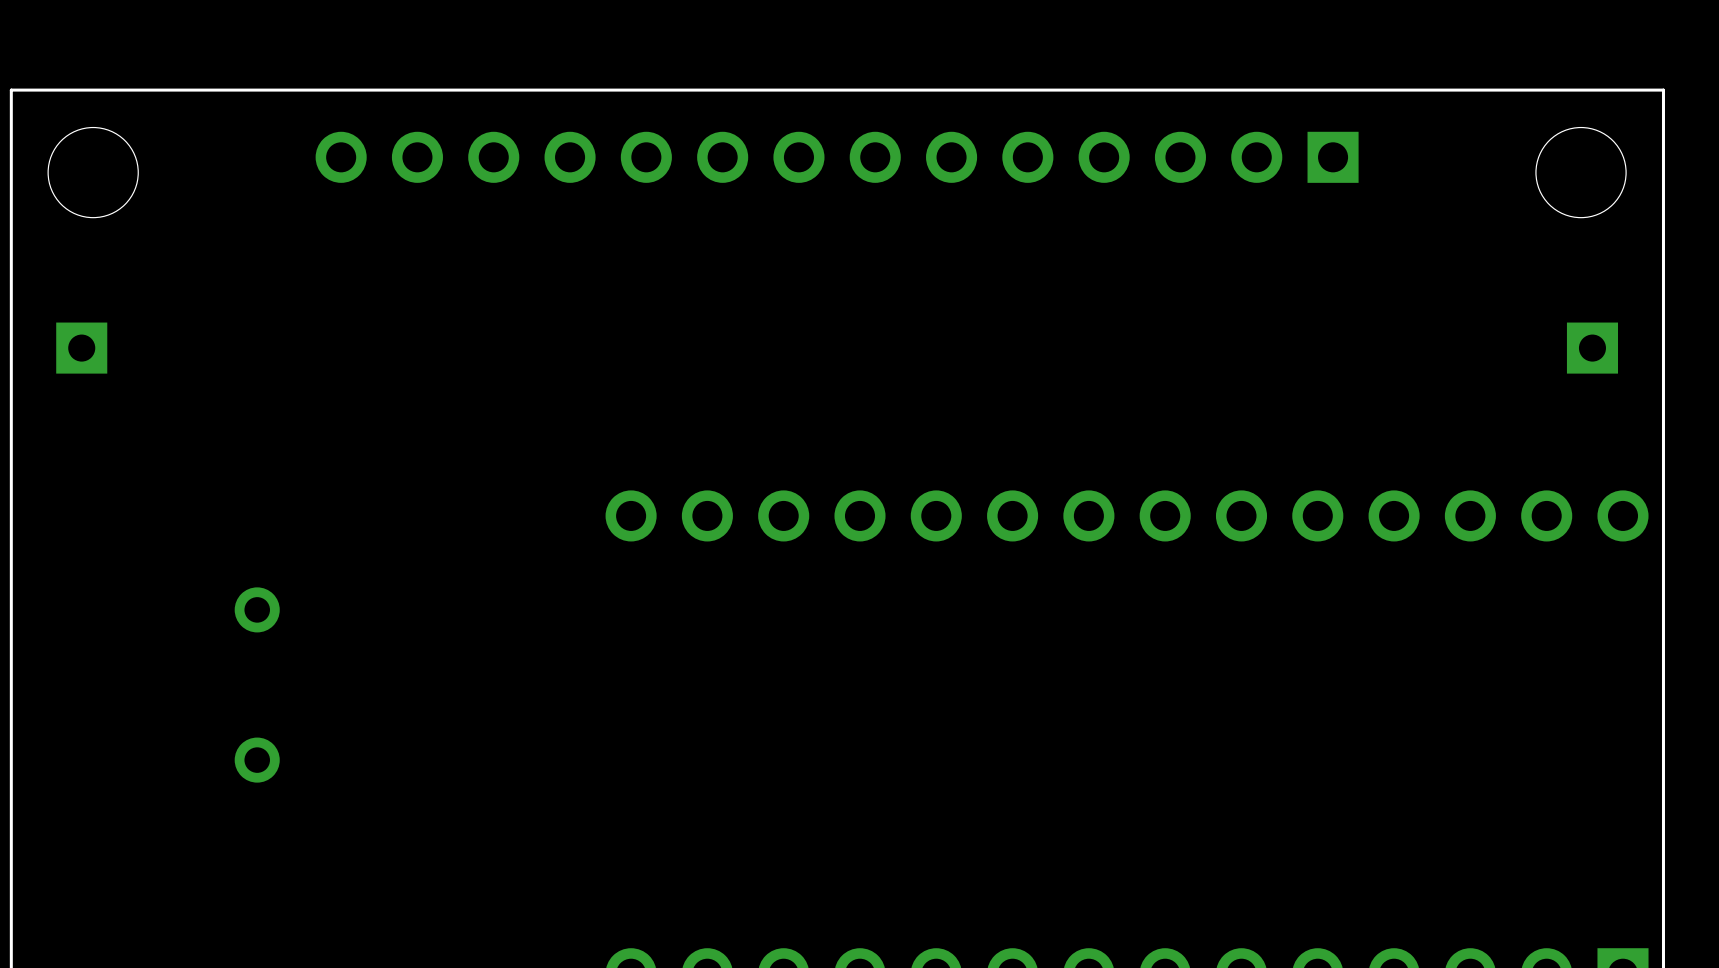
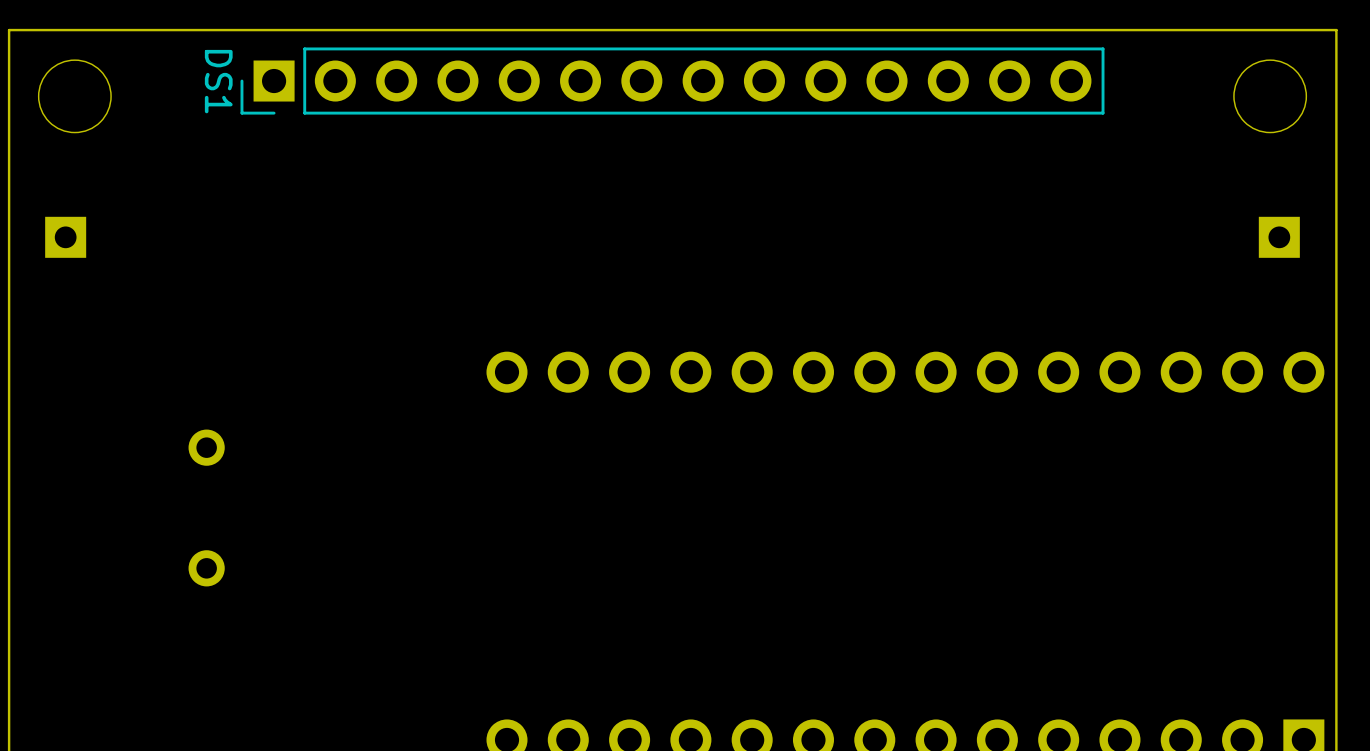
DS1 side: top (837, 157) -> bottom (672, 81)

